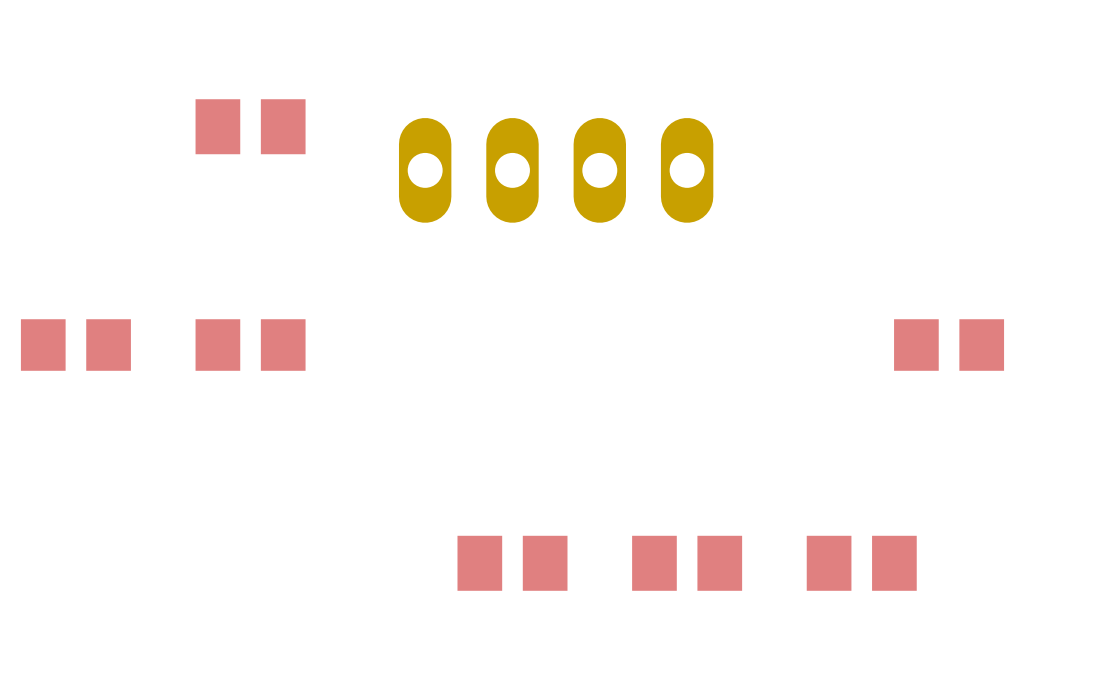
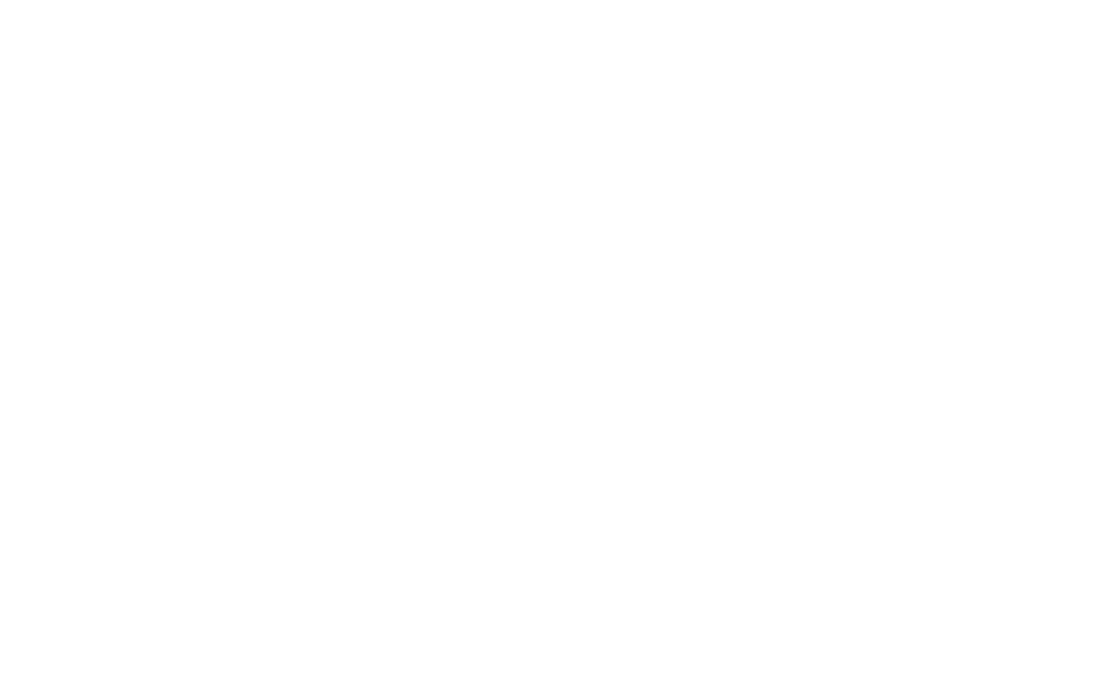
part: (250, 126) -> none
part: (556, 170) -> none
part: (75, 345) -> none
part: (250, 345) -> none
part: (949, 345) -> none
part: (512, 563) -> none
part: (687, 563) -> none
part: (861, 563) -> none

